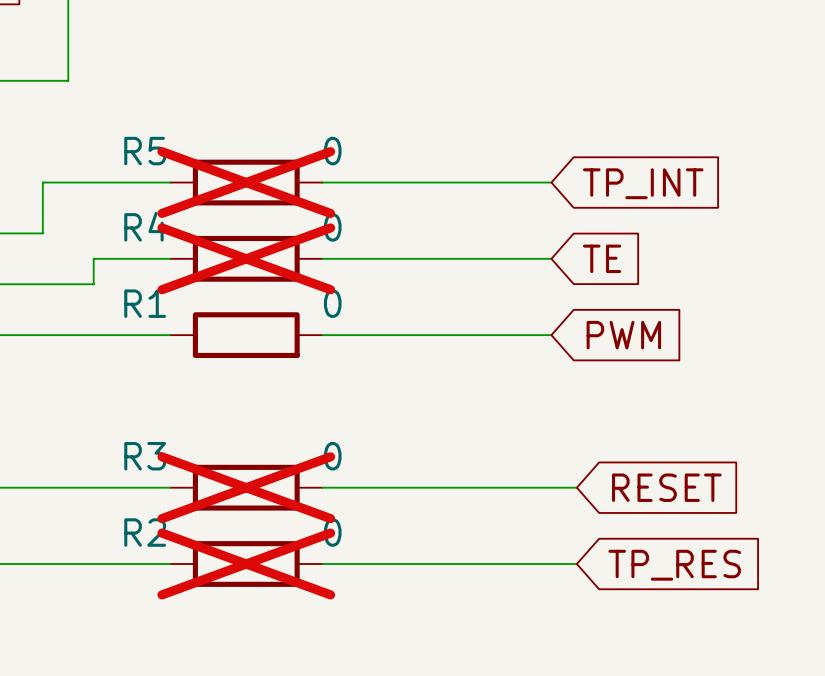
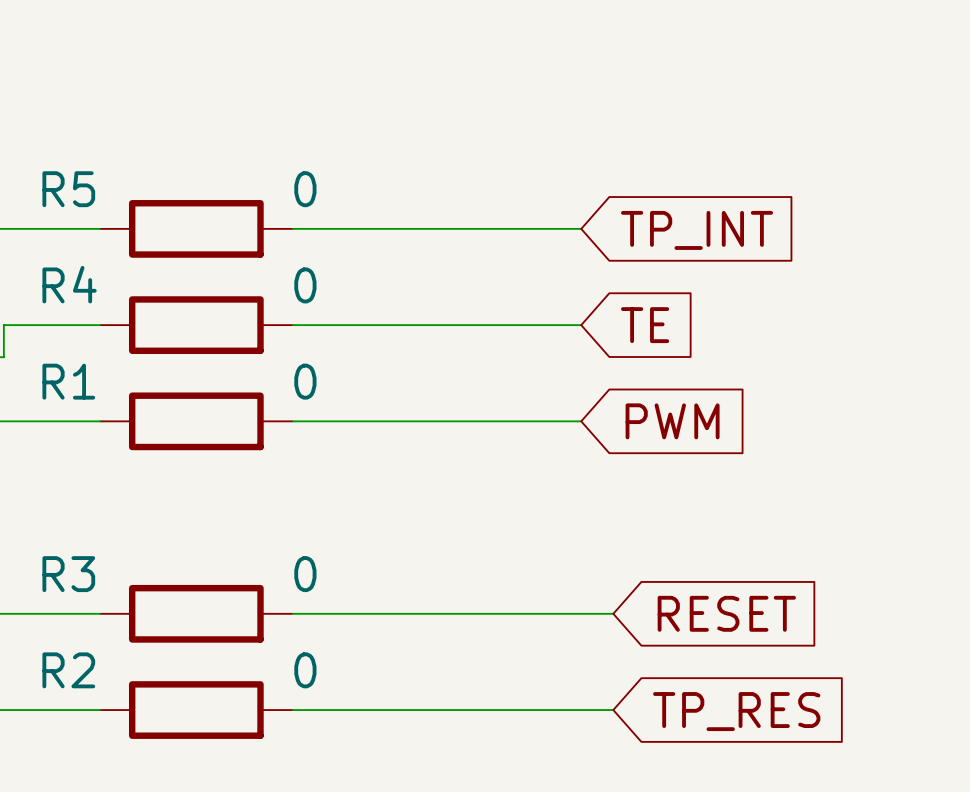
R5 do-not-place cross: (246, 182) -> none
R4 do-not-place cross: (246, 258) -> none
R3 do-not-place cross: (246, 487) -> none
R2 do-not-place cross: (246, 564) -> none

